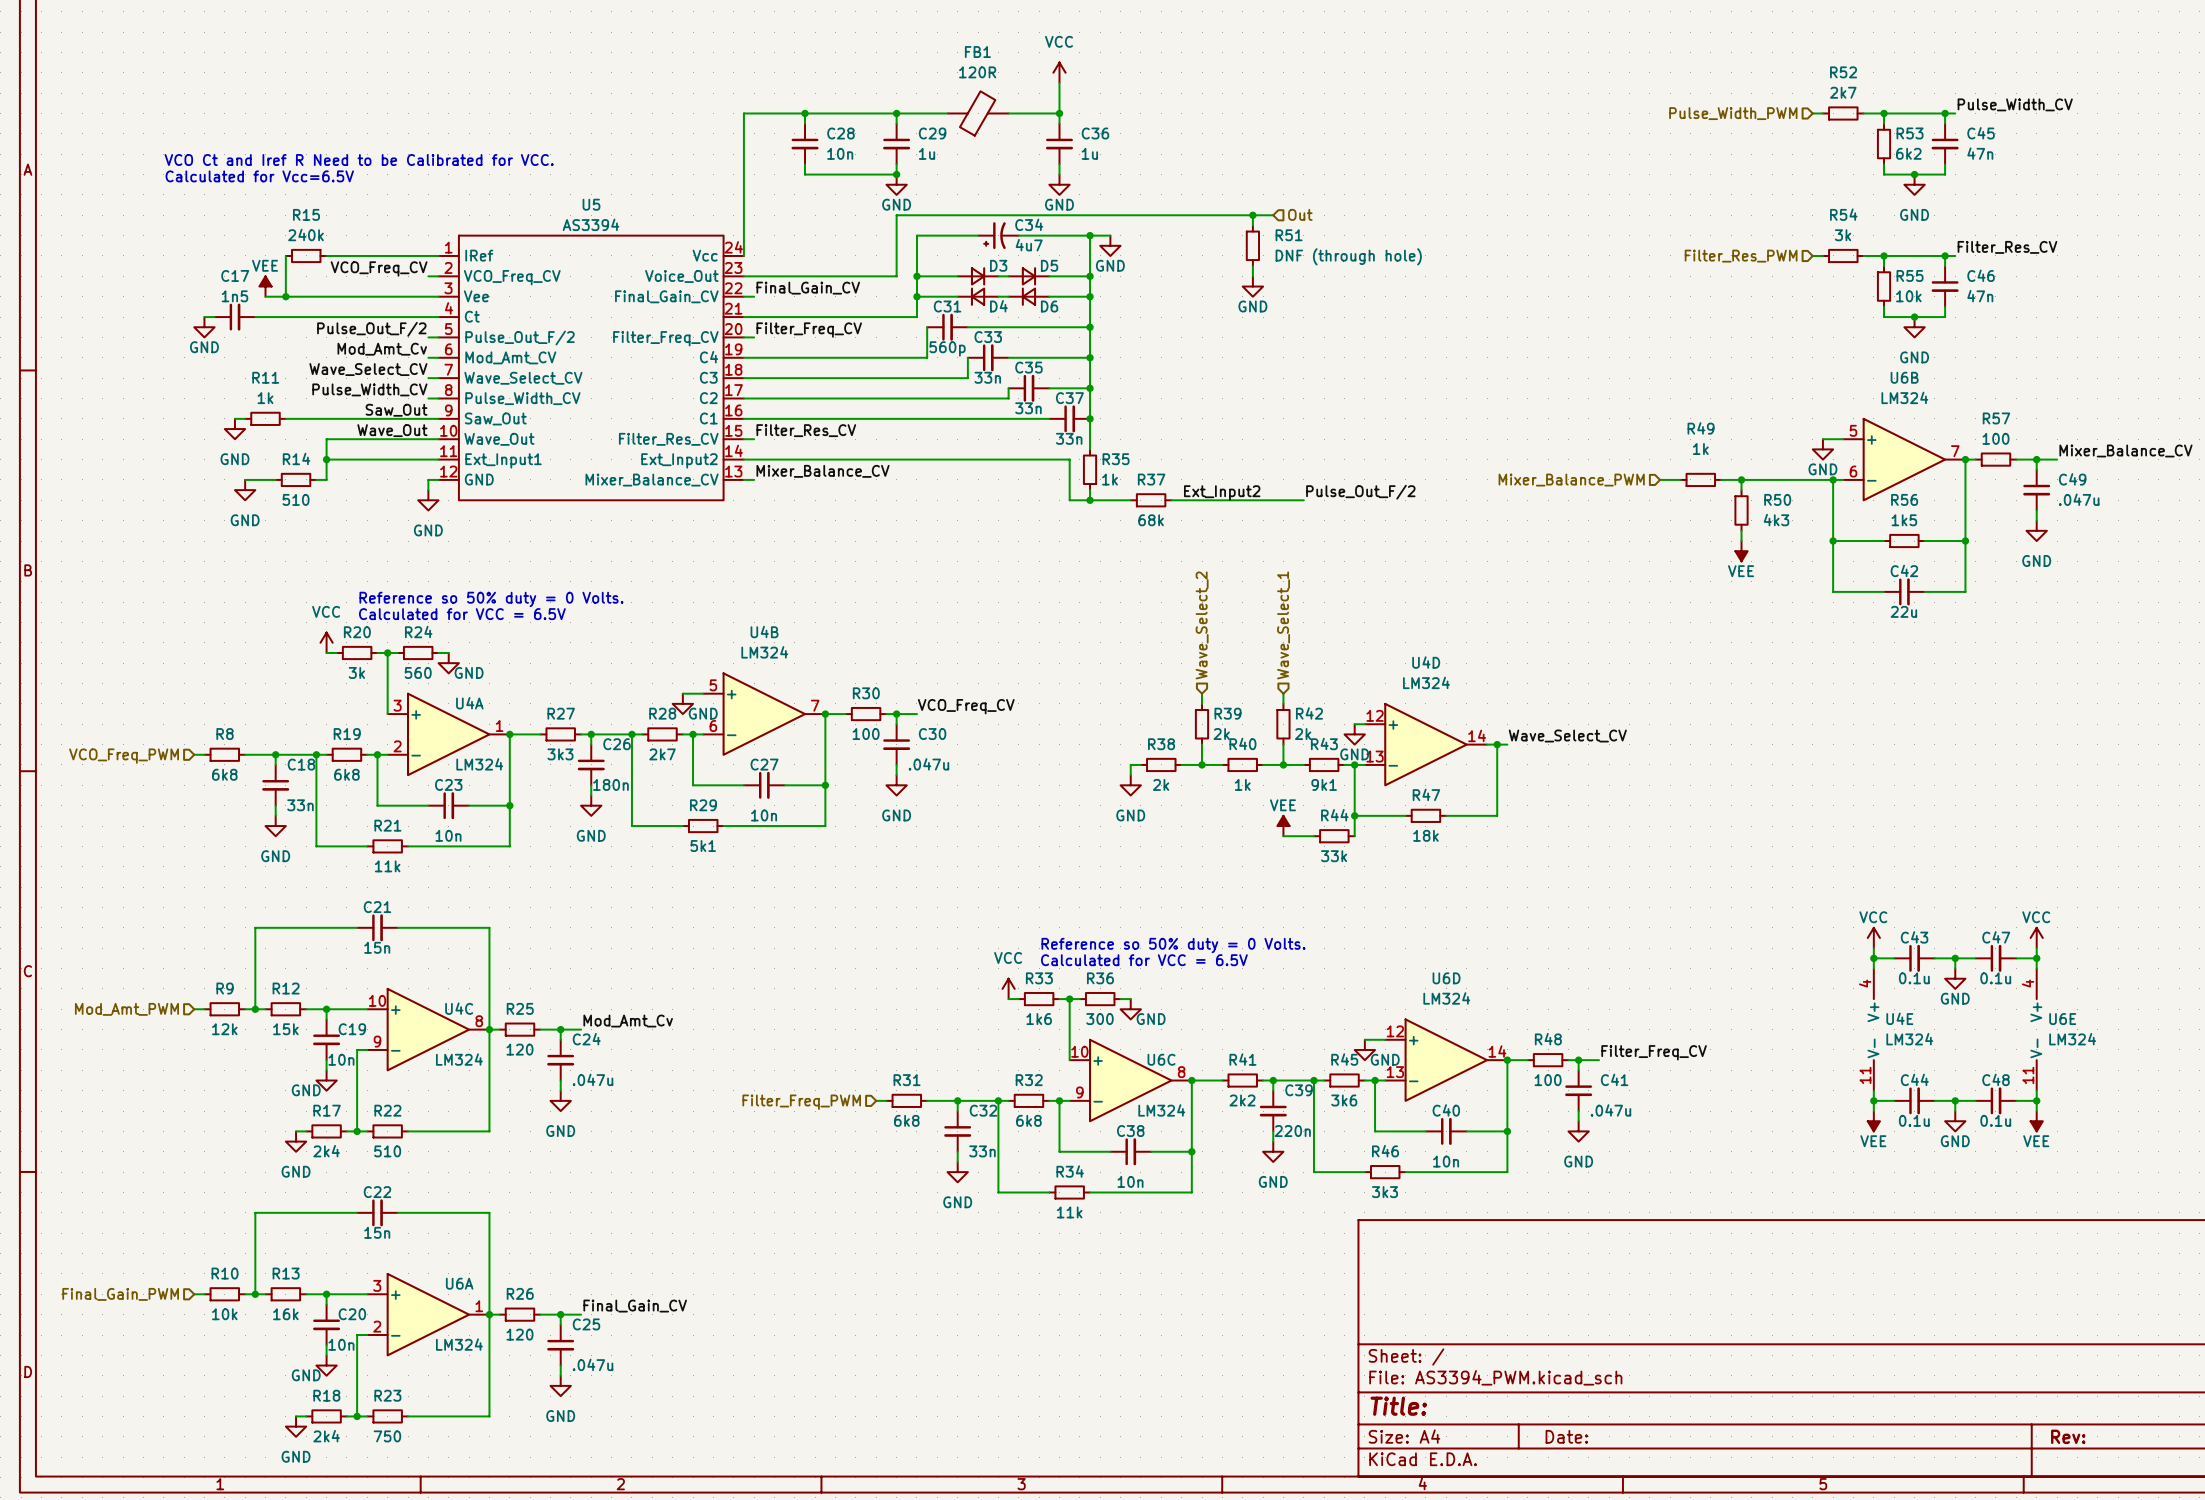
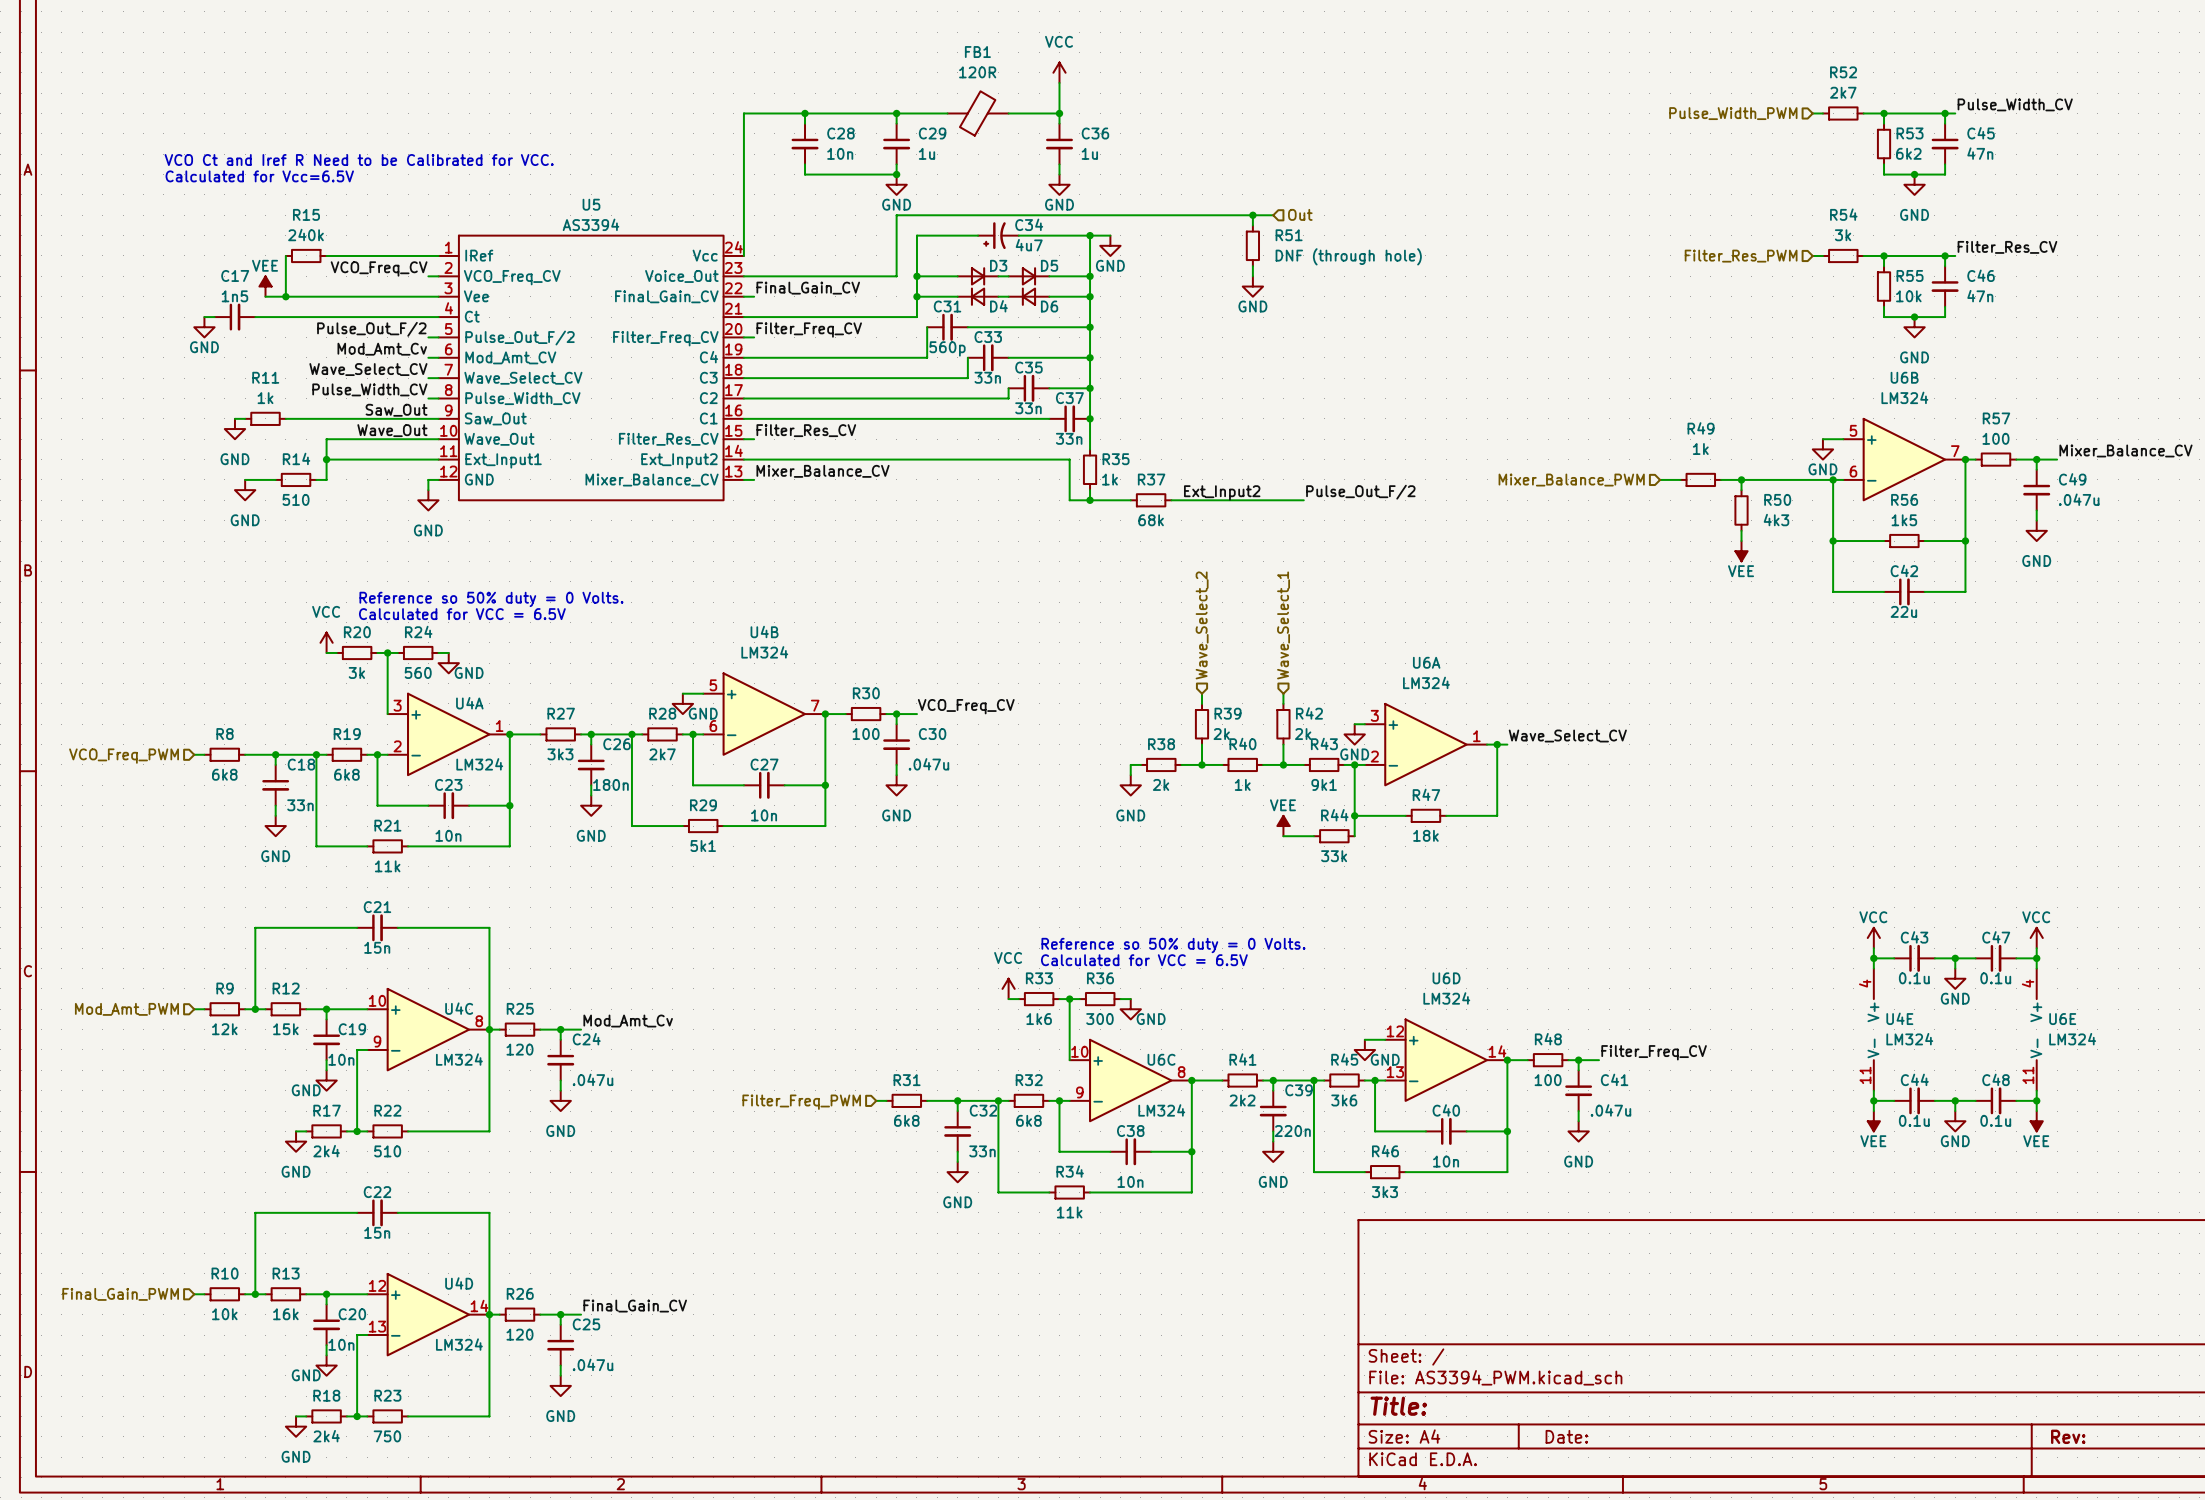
U4D name position: U4D (1426, 662) -> U4D (459, 1283)
U4D position: (1425, 744) -> (428, 1314)
U6A name position: U6A (459, 1283) -> U6A (1426, 662)
U6A position: (428, 1314) -> (1425, 744)

